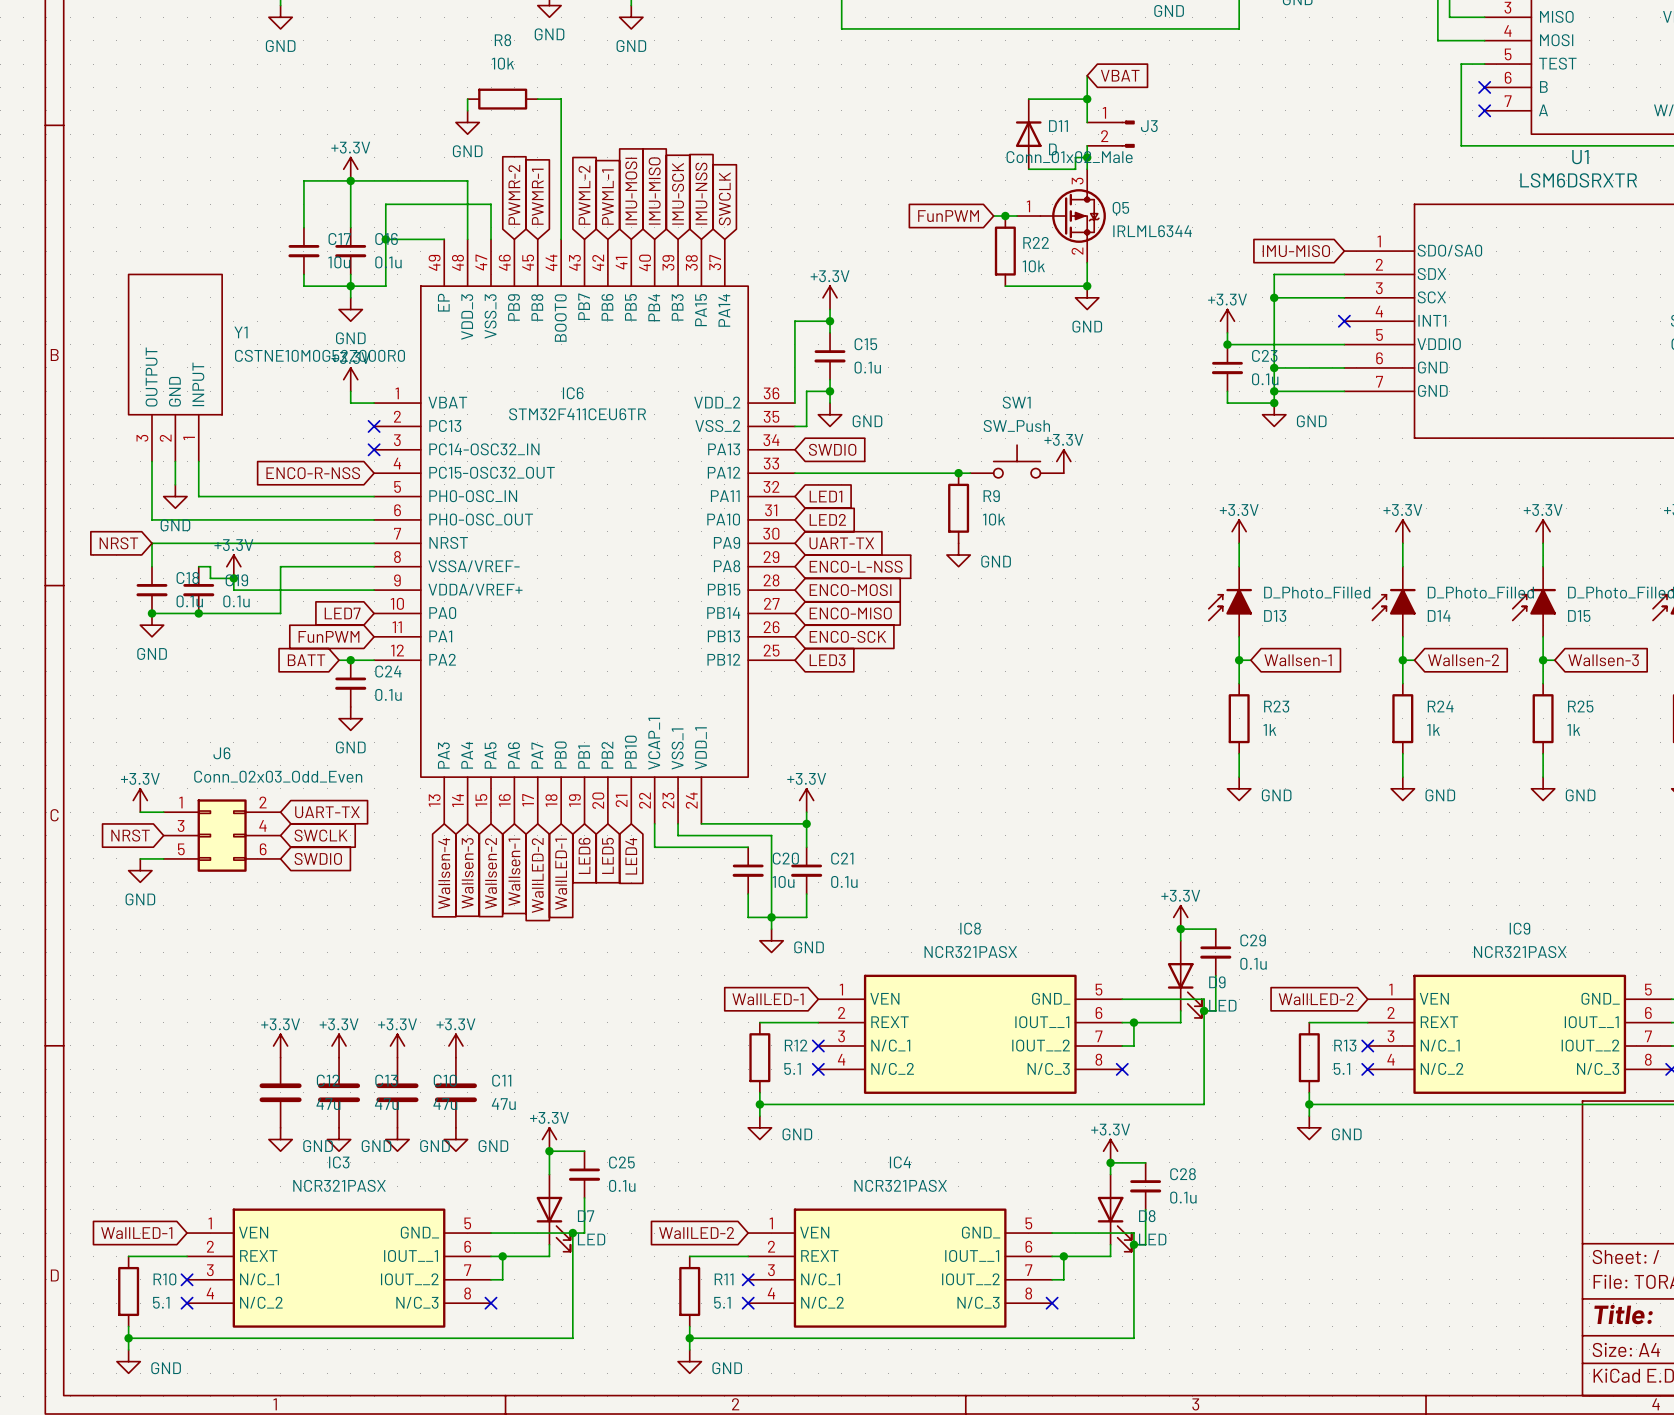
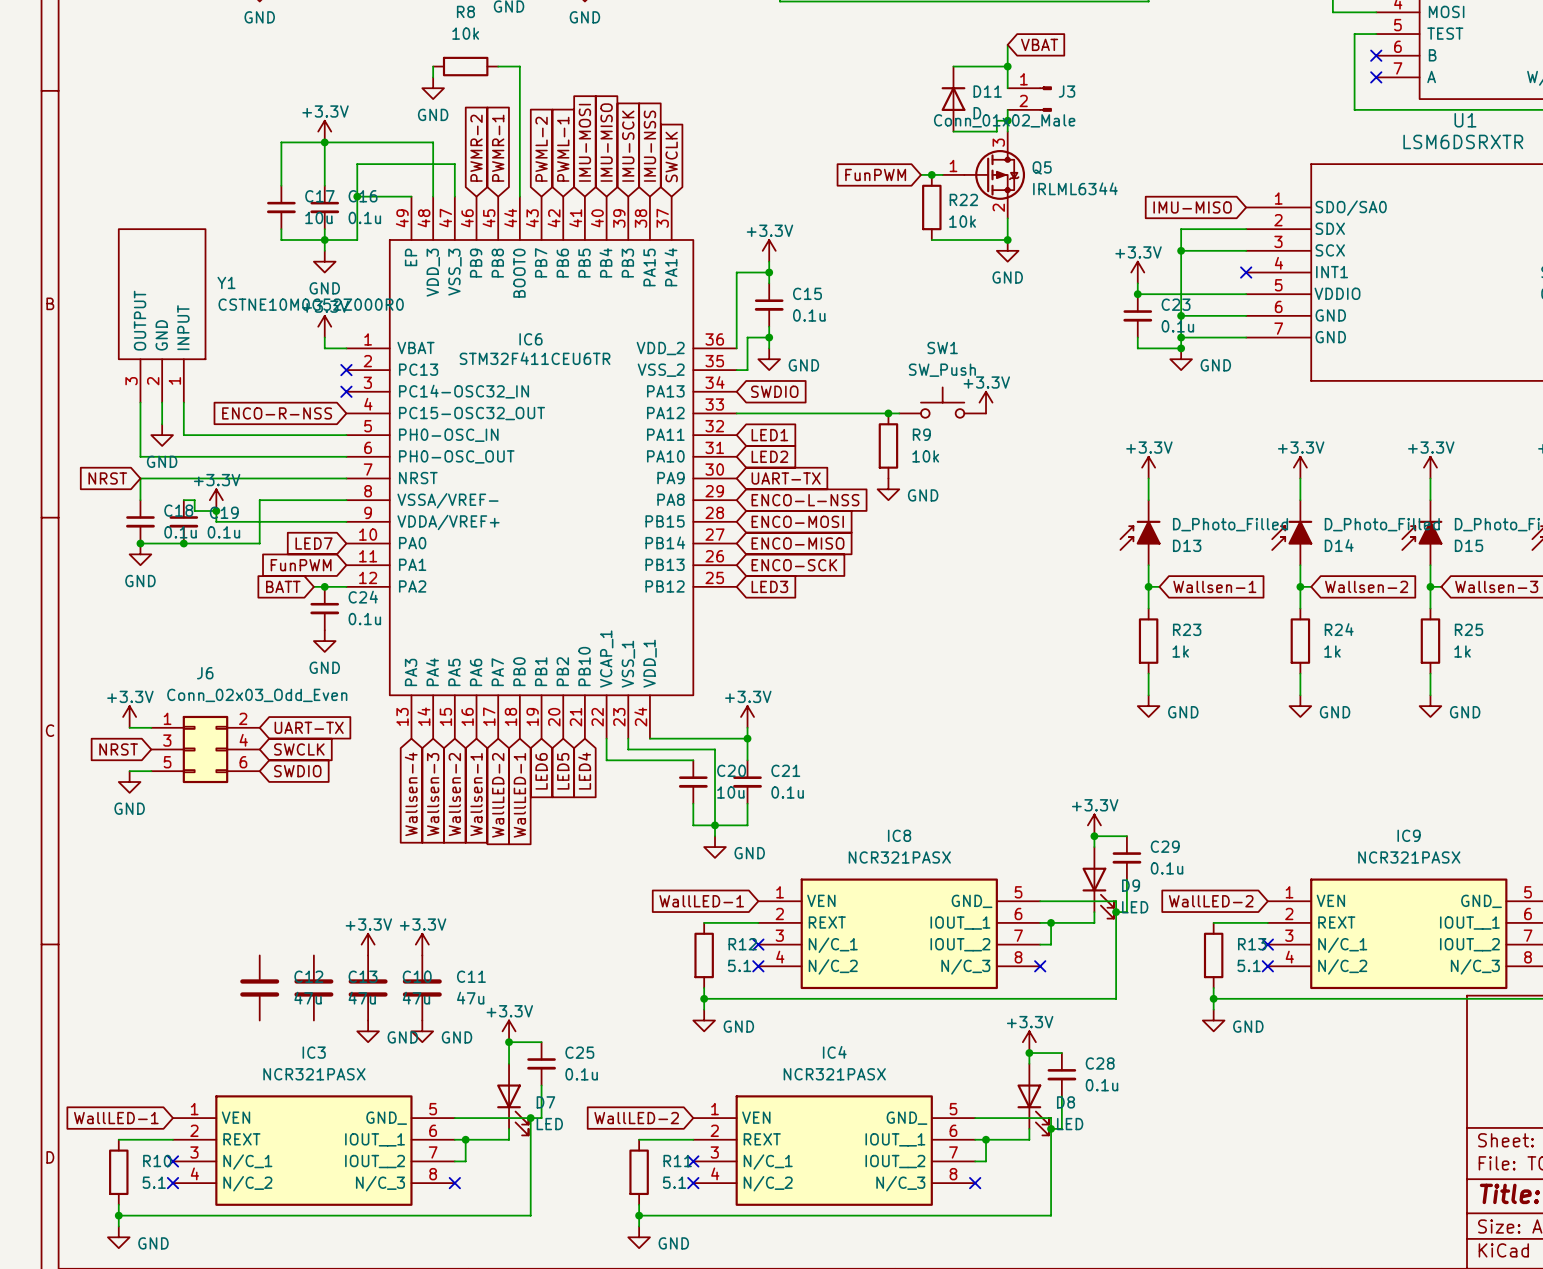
power symbol: +3.3V (280, 1045) -> none
power symbol: +3.3V (339, 1045) -> none
power symbol: GND (280, 1139) -> none
power symbol: GND (339, 1139) -> none

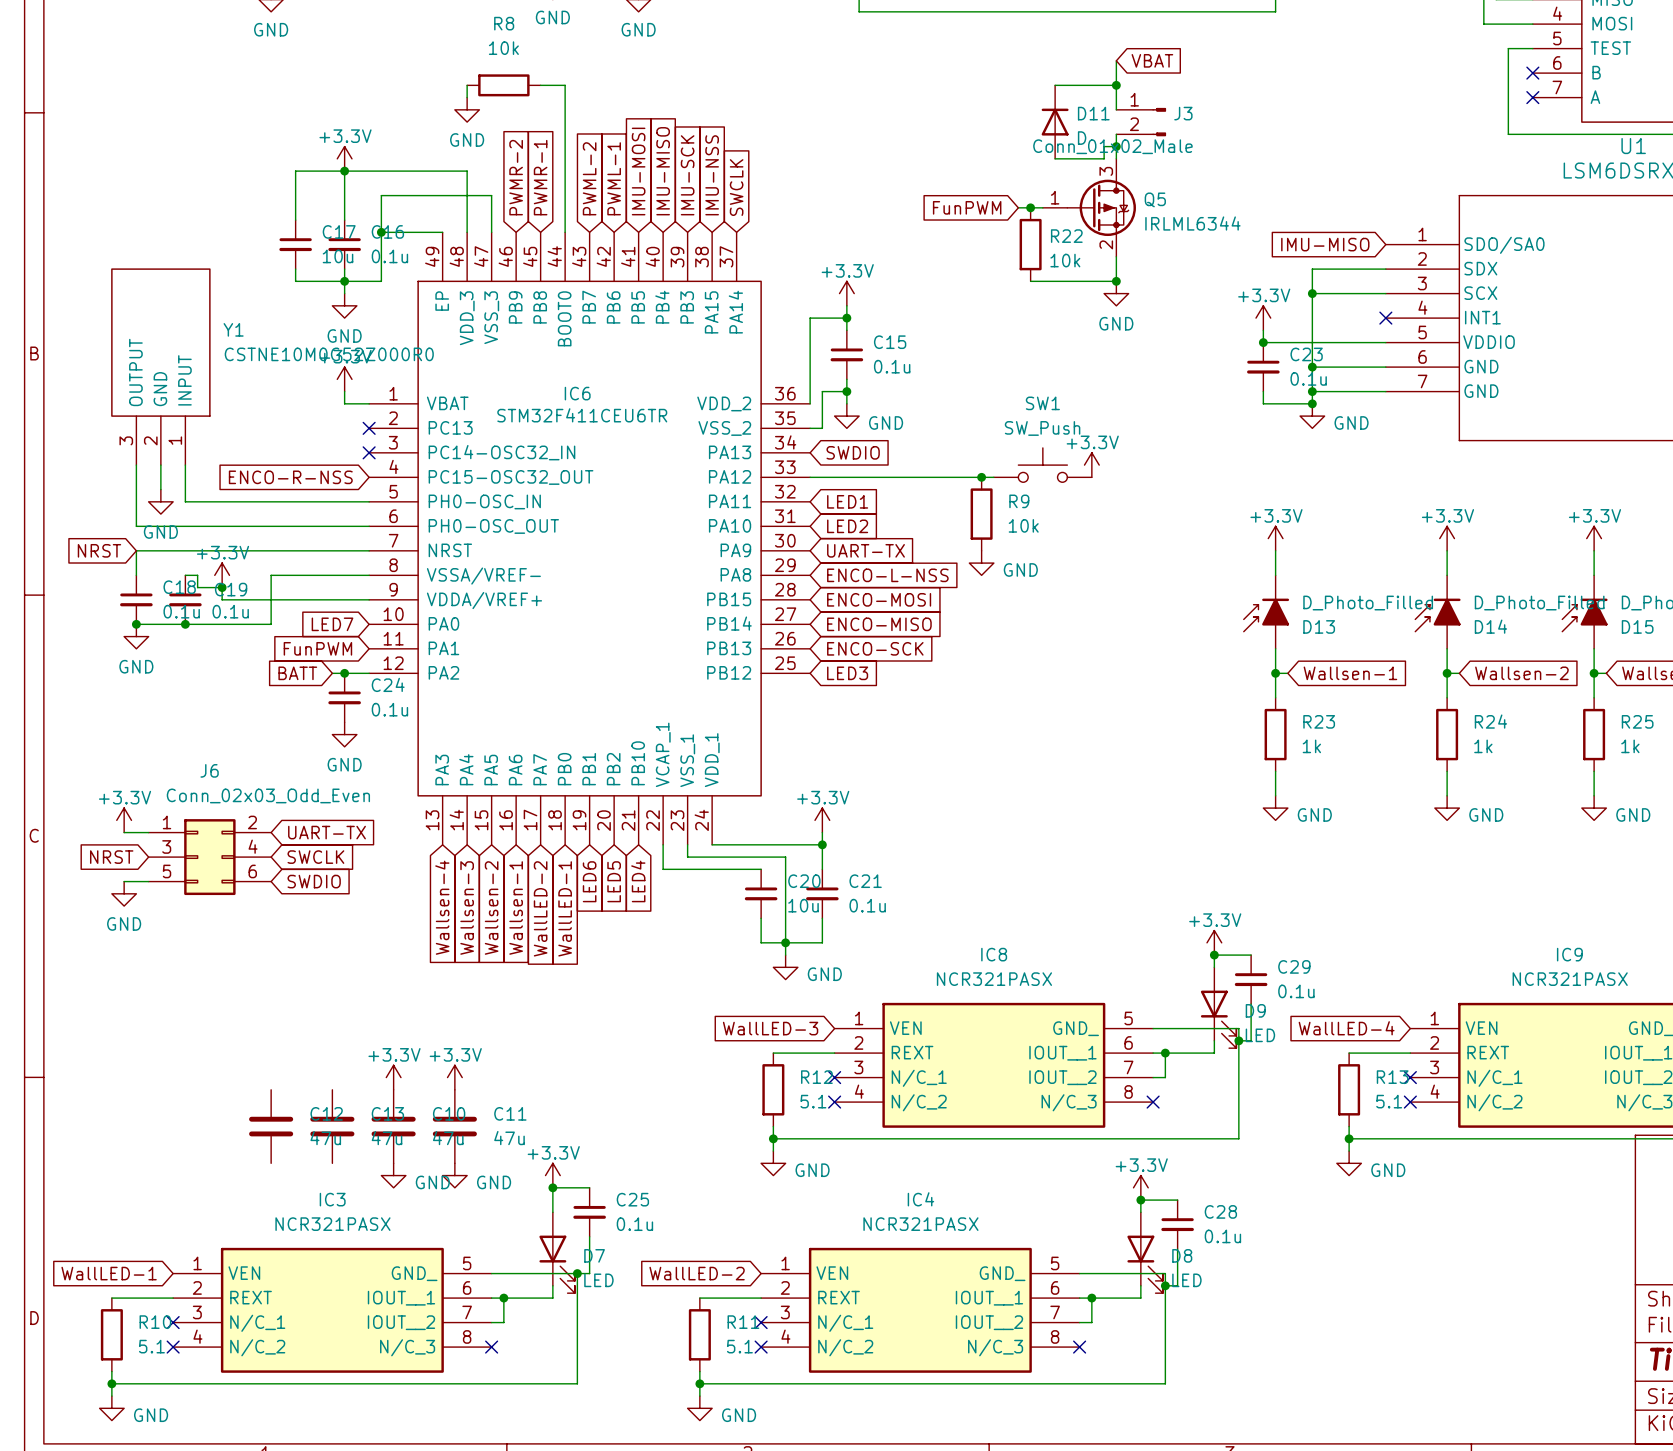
global label: WallLED-1 (701, 901) -> WallLED-3 (770, 1028)
global label: WallLED-2 (1211, 901) -> WallLED-4 (1346, 1028)

